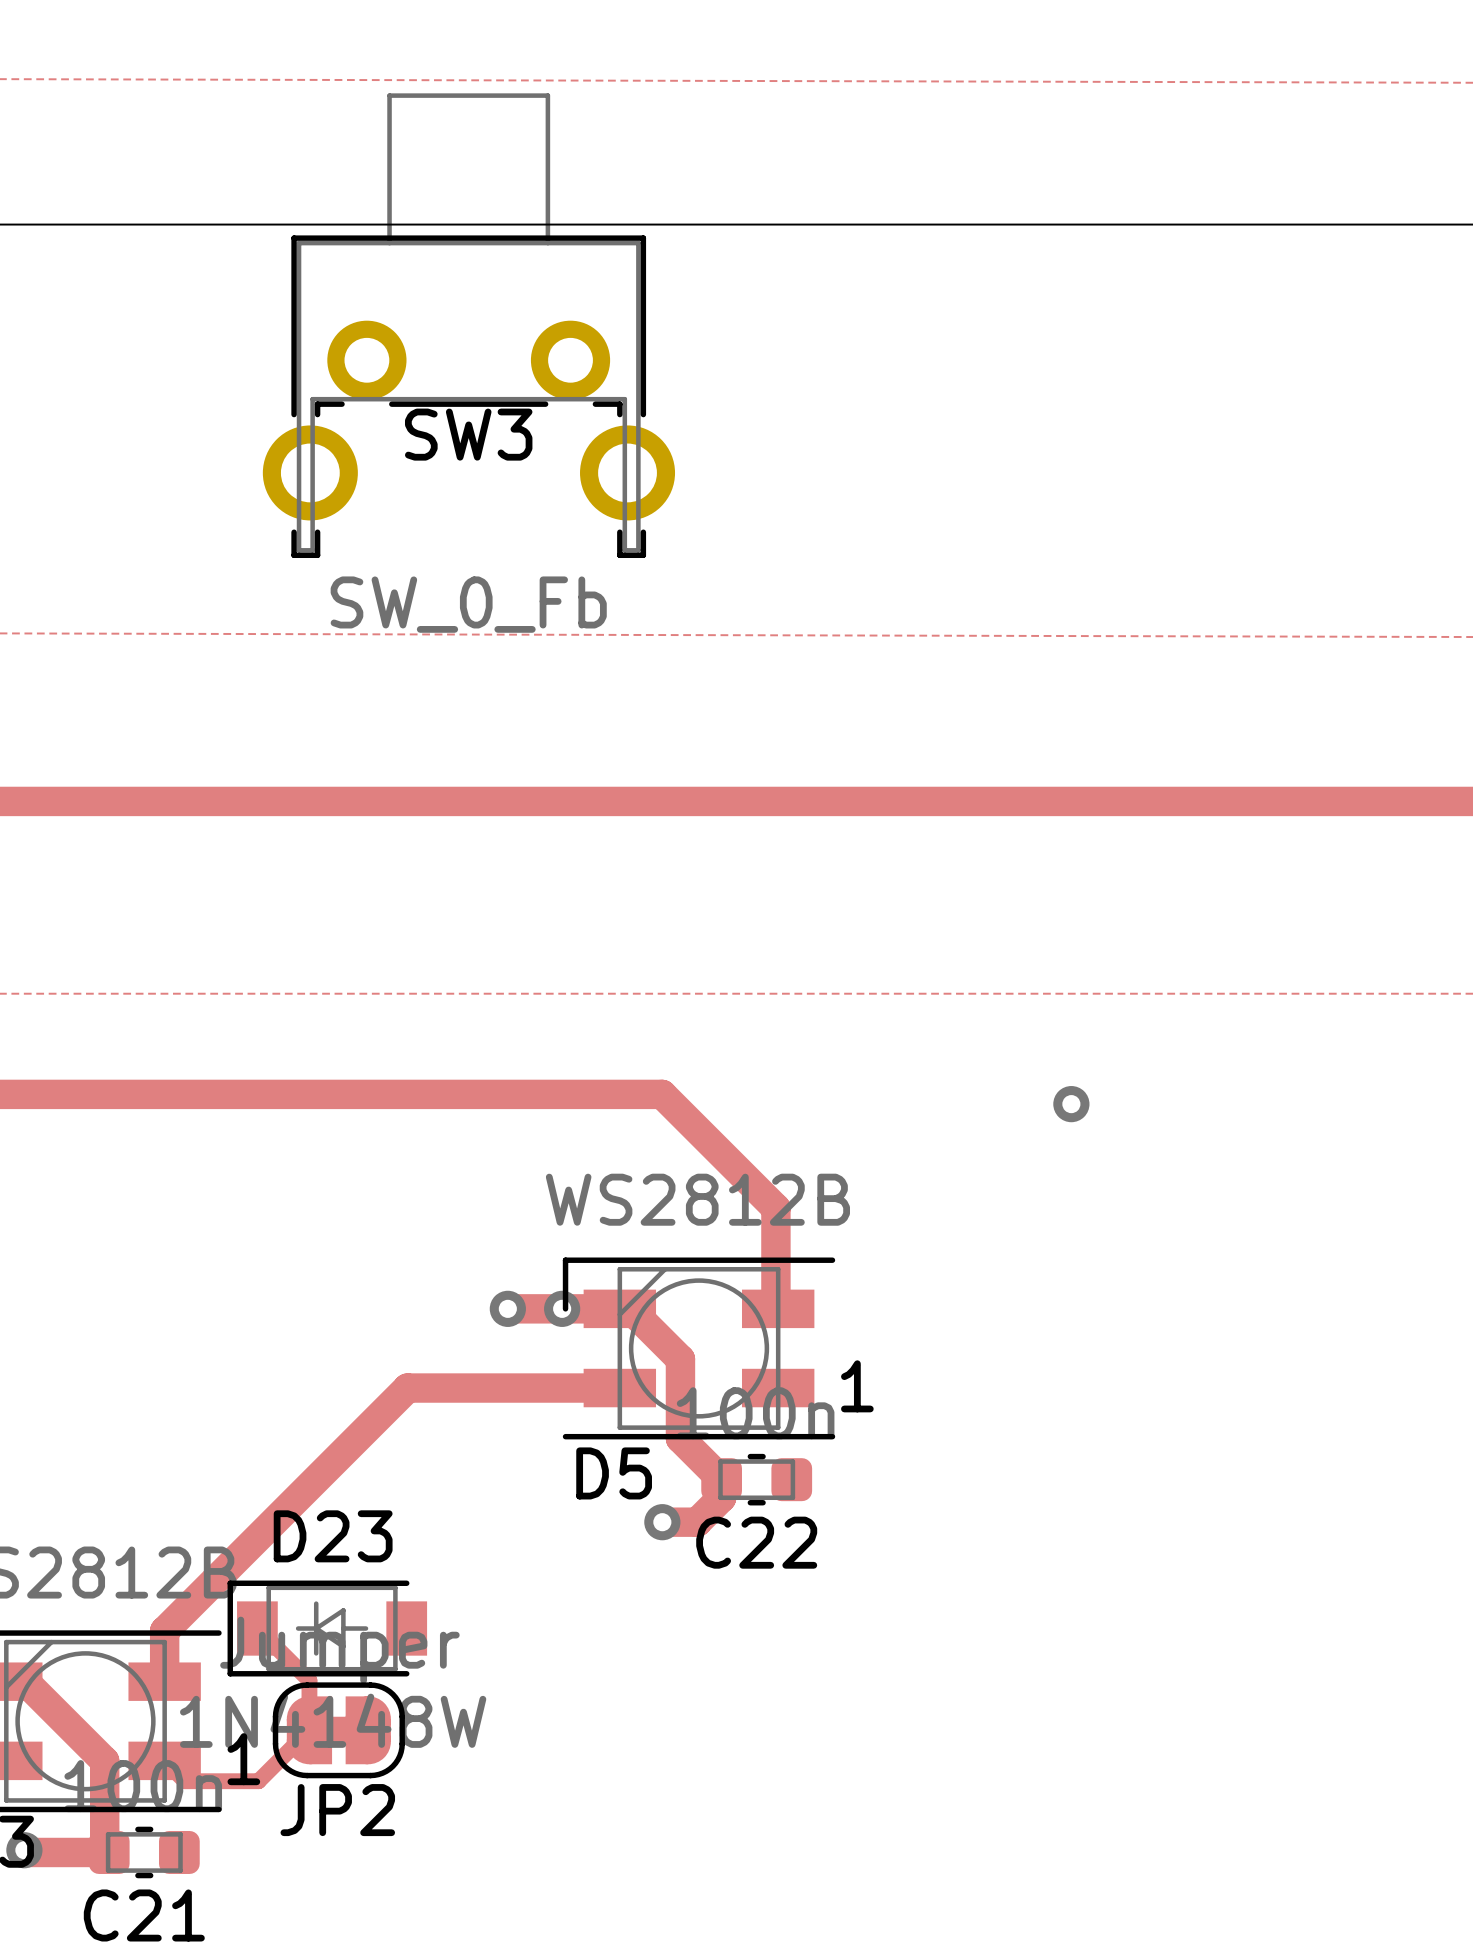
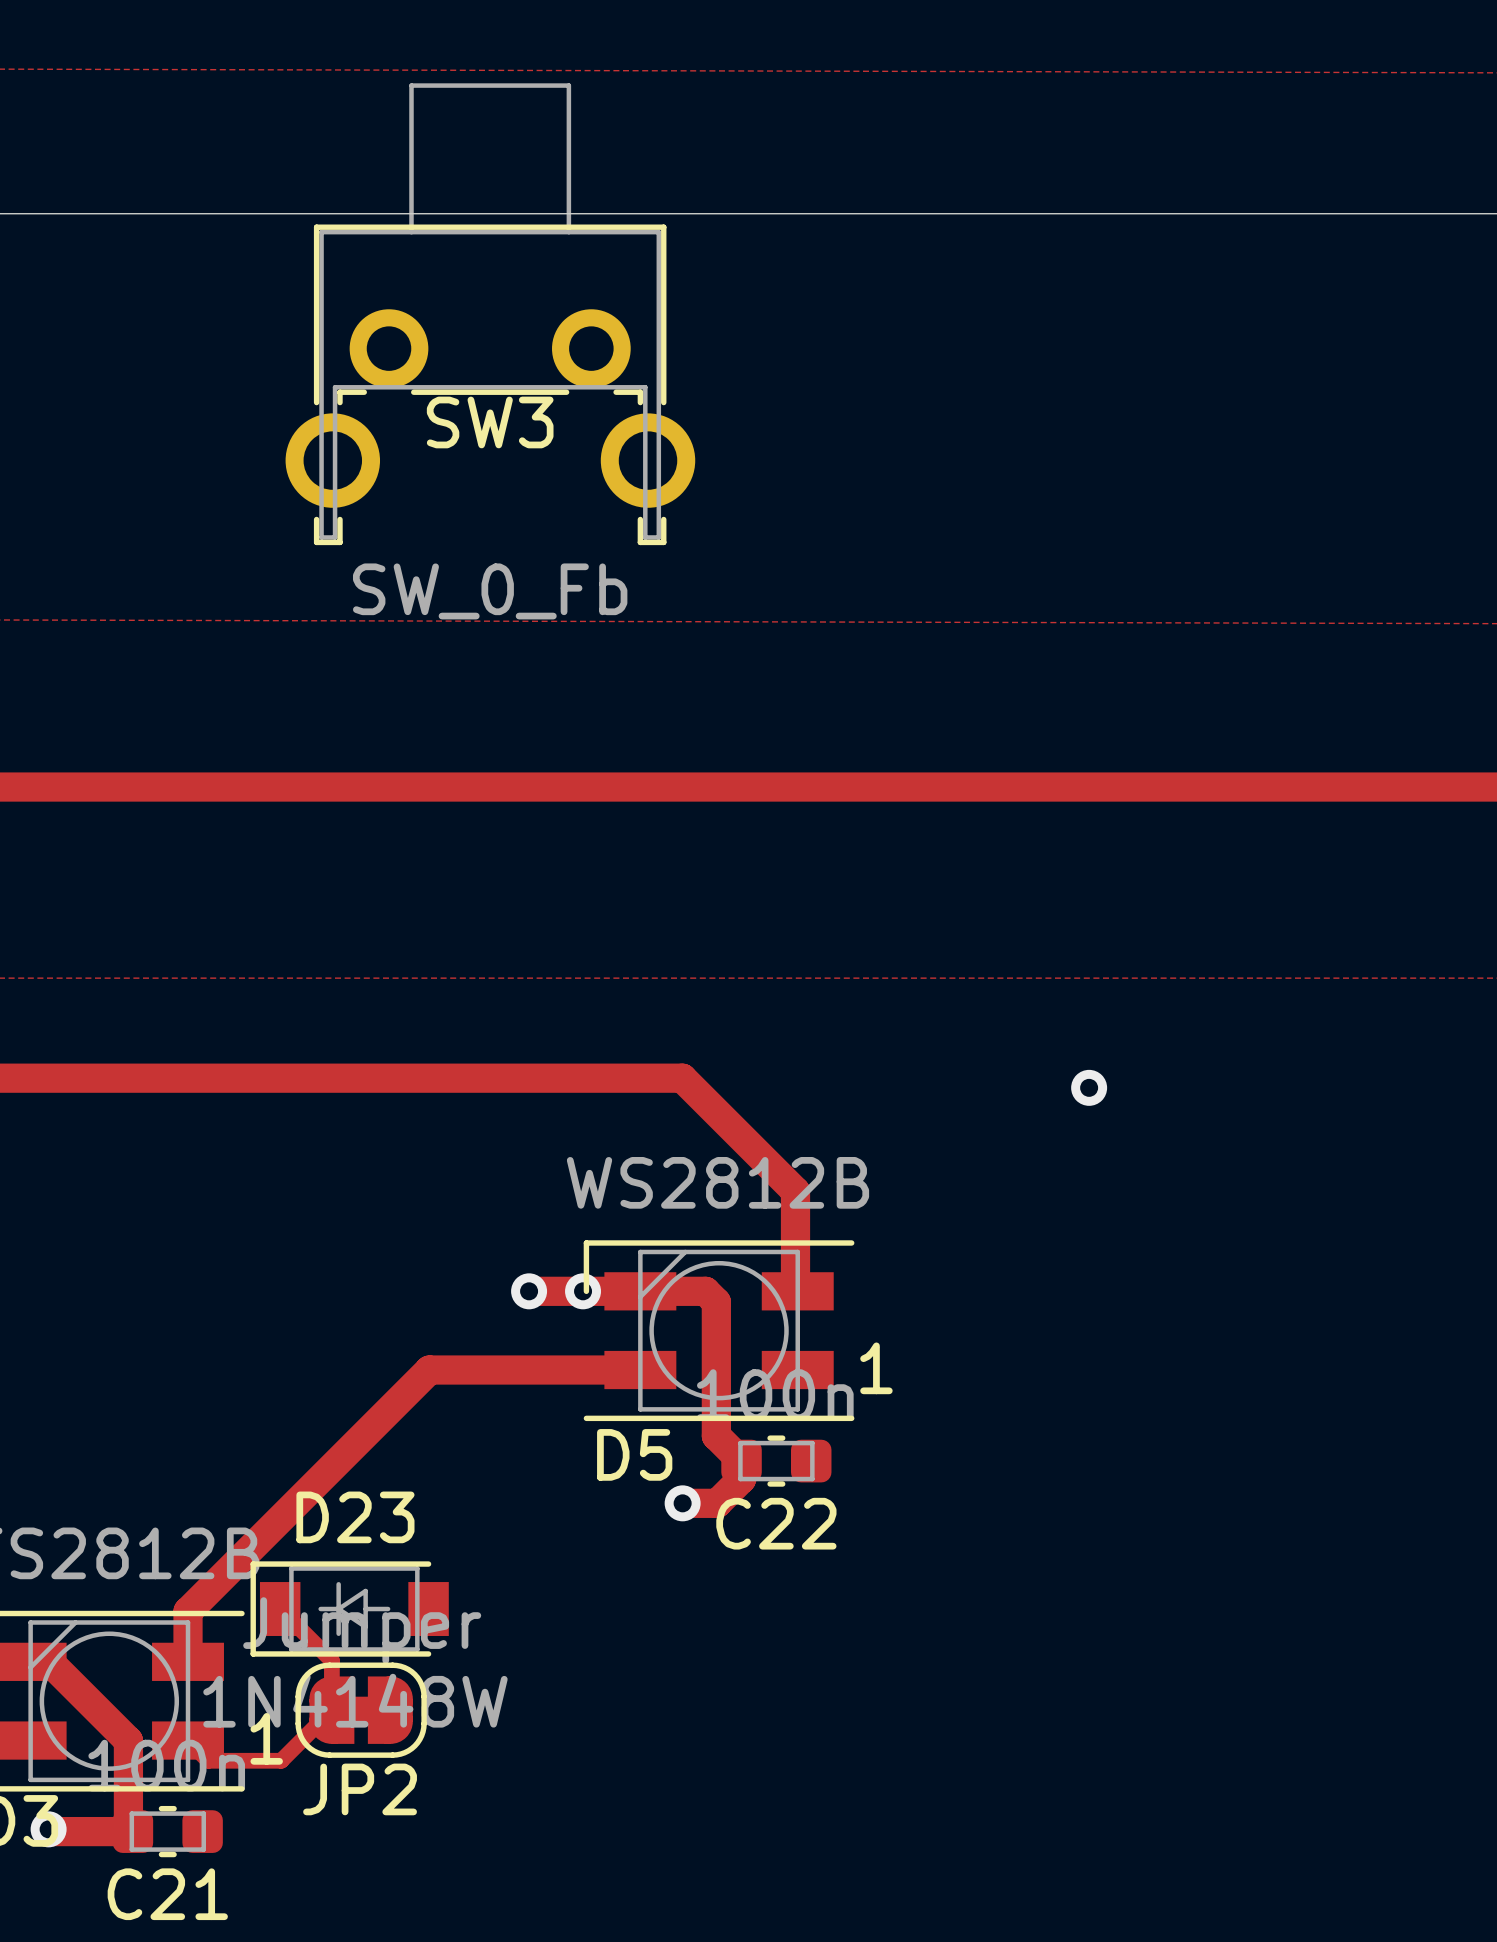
track: (630, 1308) (680, 1359) (680, 1438) (696, 1454) -> (650, 1291) (705, 1291) (716, 1302) (716, 1435)

